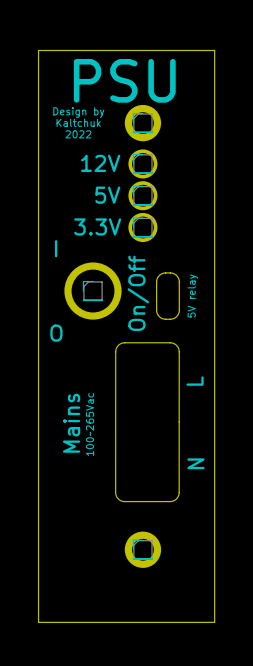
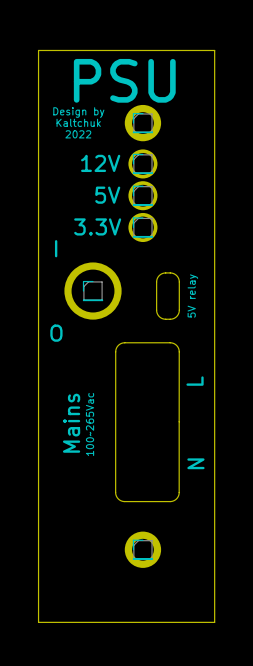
text: On/Off (138, 293) -> none

